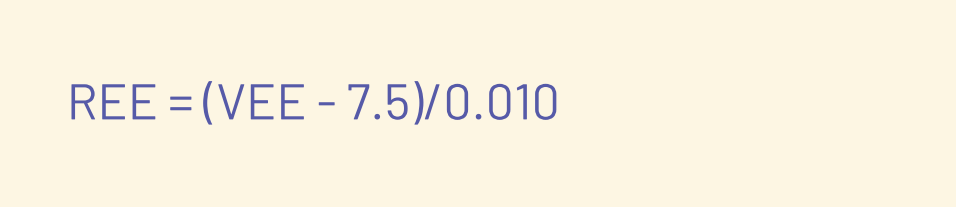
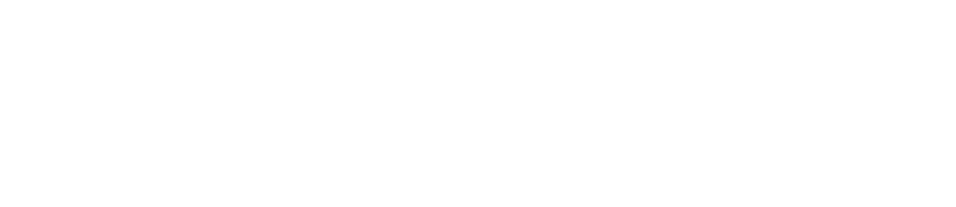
text: REE = (VEE - 7.5)/0.010 (313, 102) -> none

